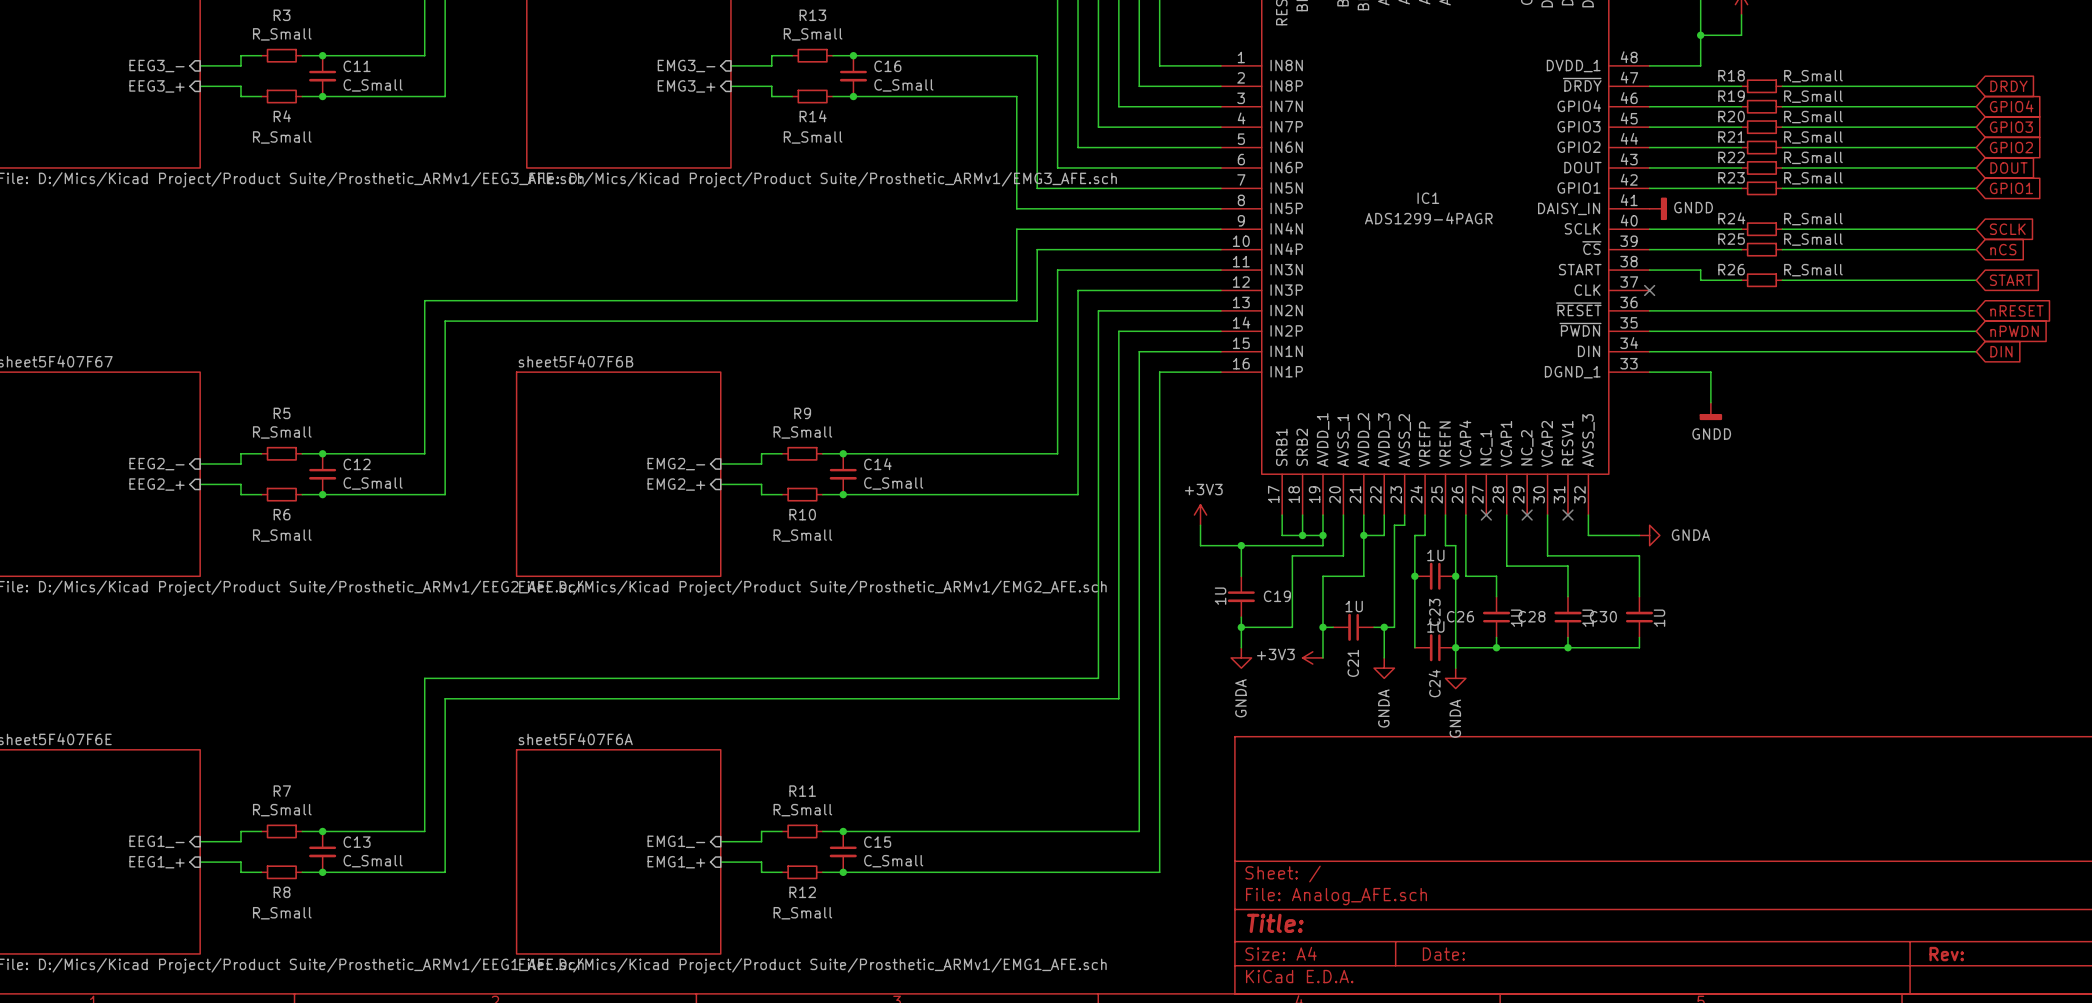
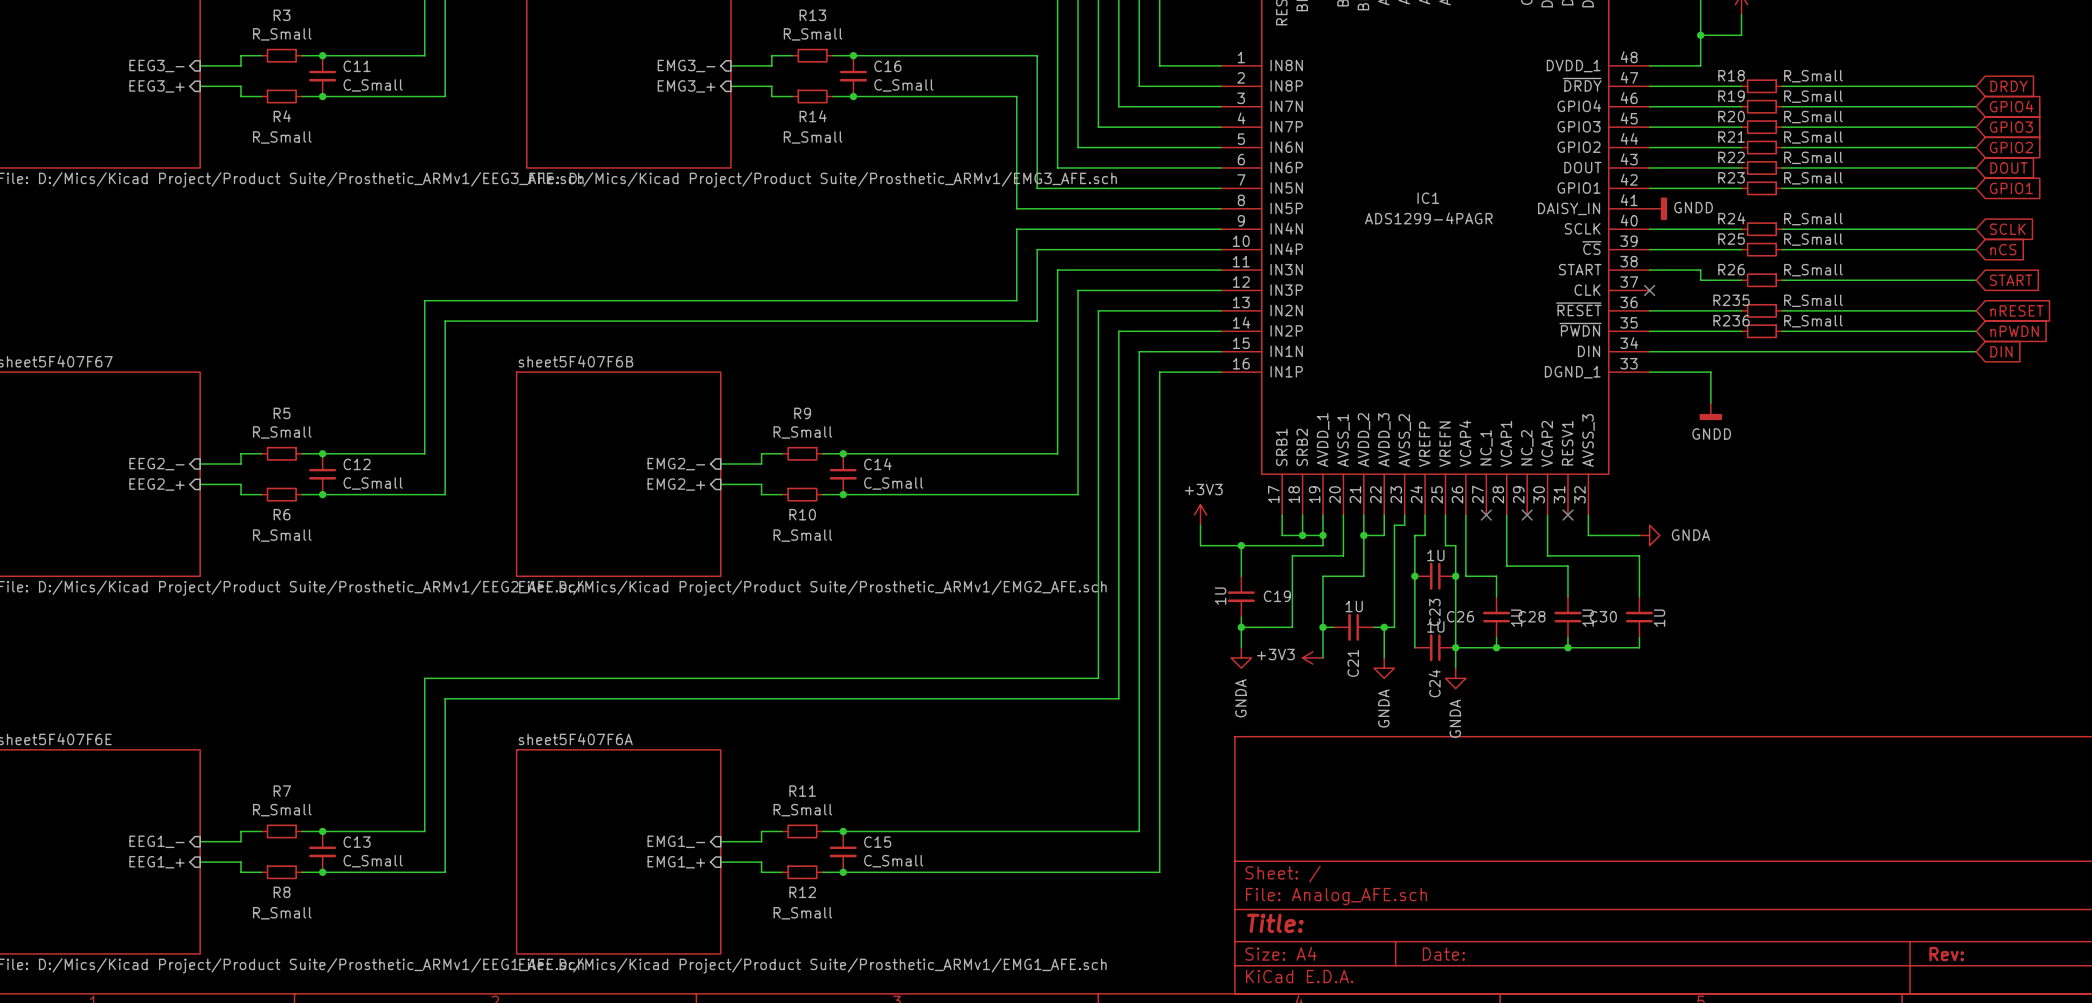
wire: (1741, 310) (1782, 310) -> none
R235: none -> R_Small (1761, 310)
wire: (1741, 331) (1782, 331) -> none
R236: none -> R_Small (1761, 331)

